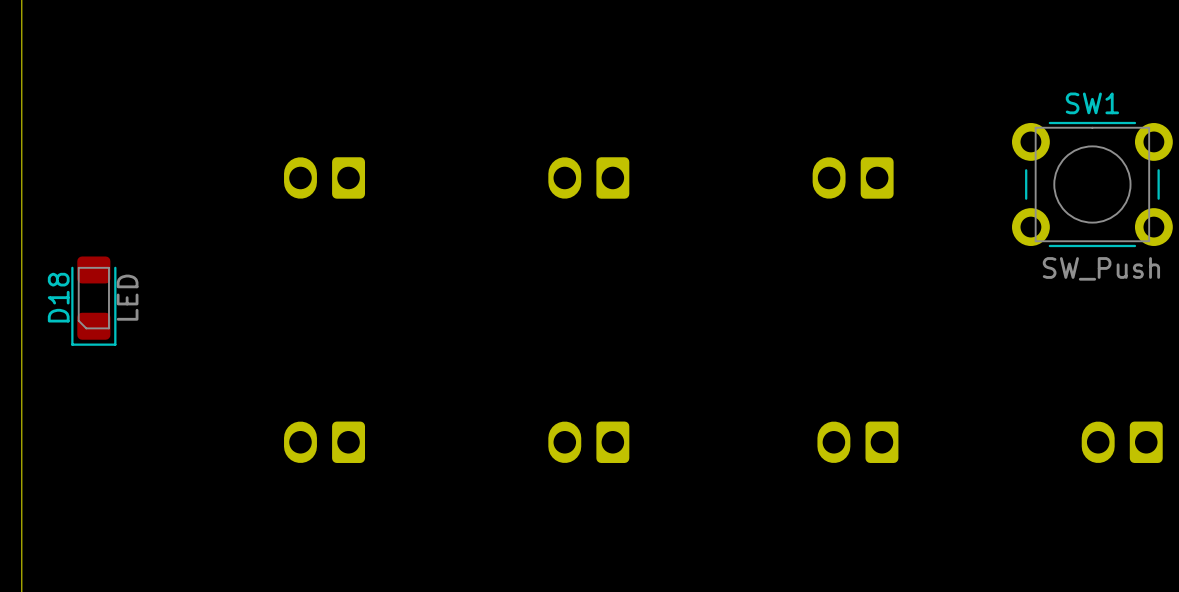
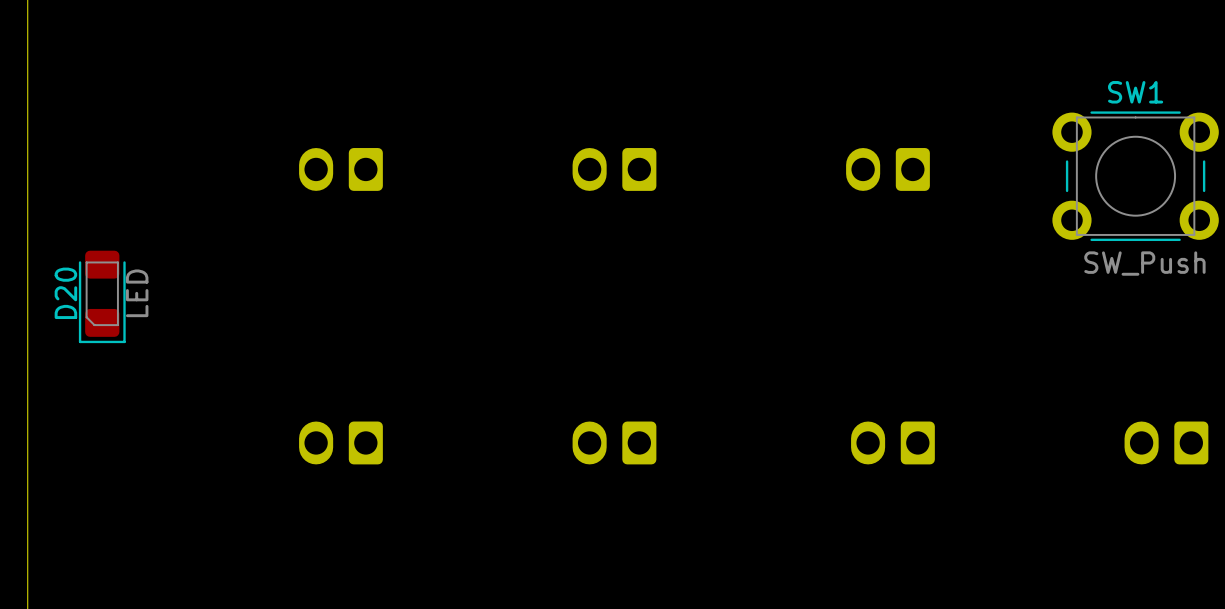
D18 name: D18 (58, 297) -> D20 (65, 293)

